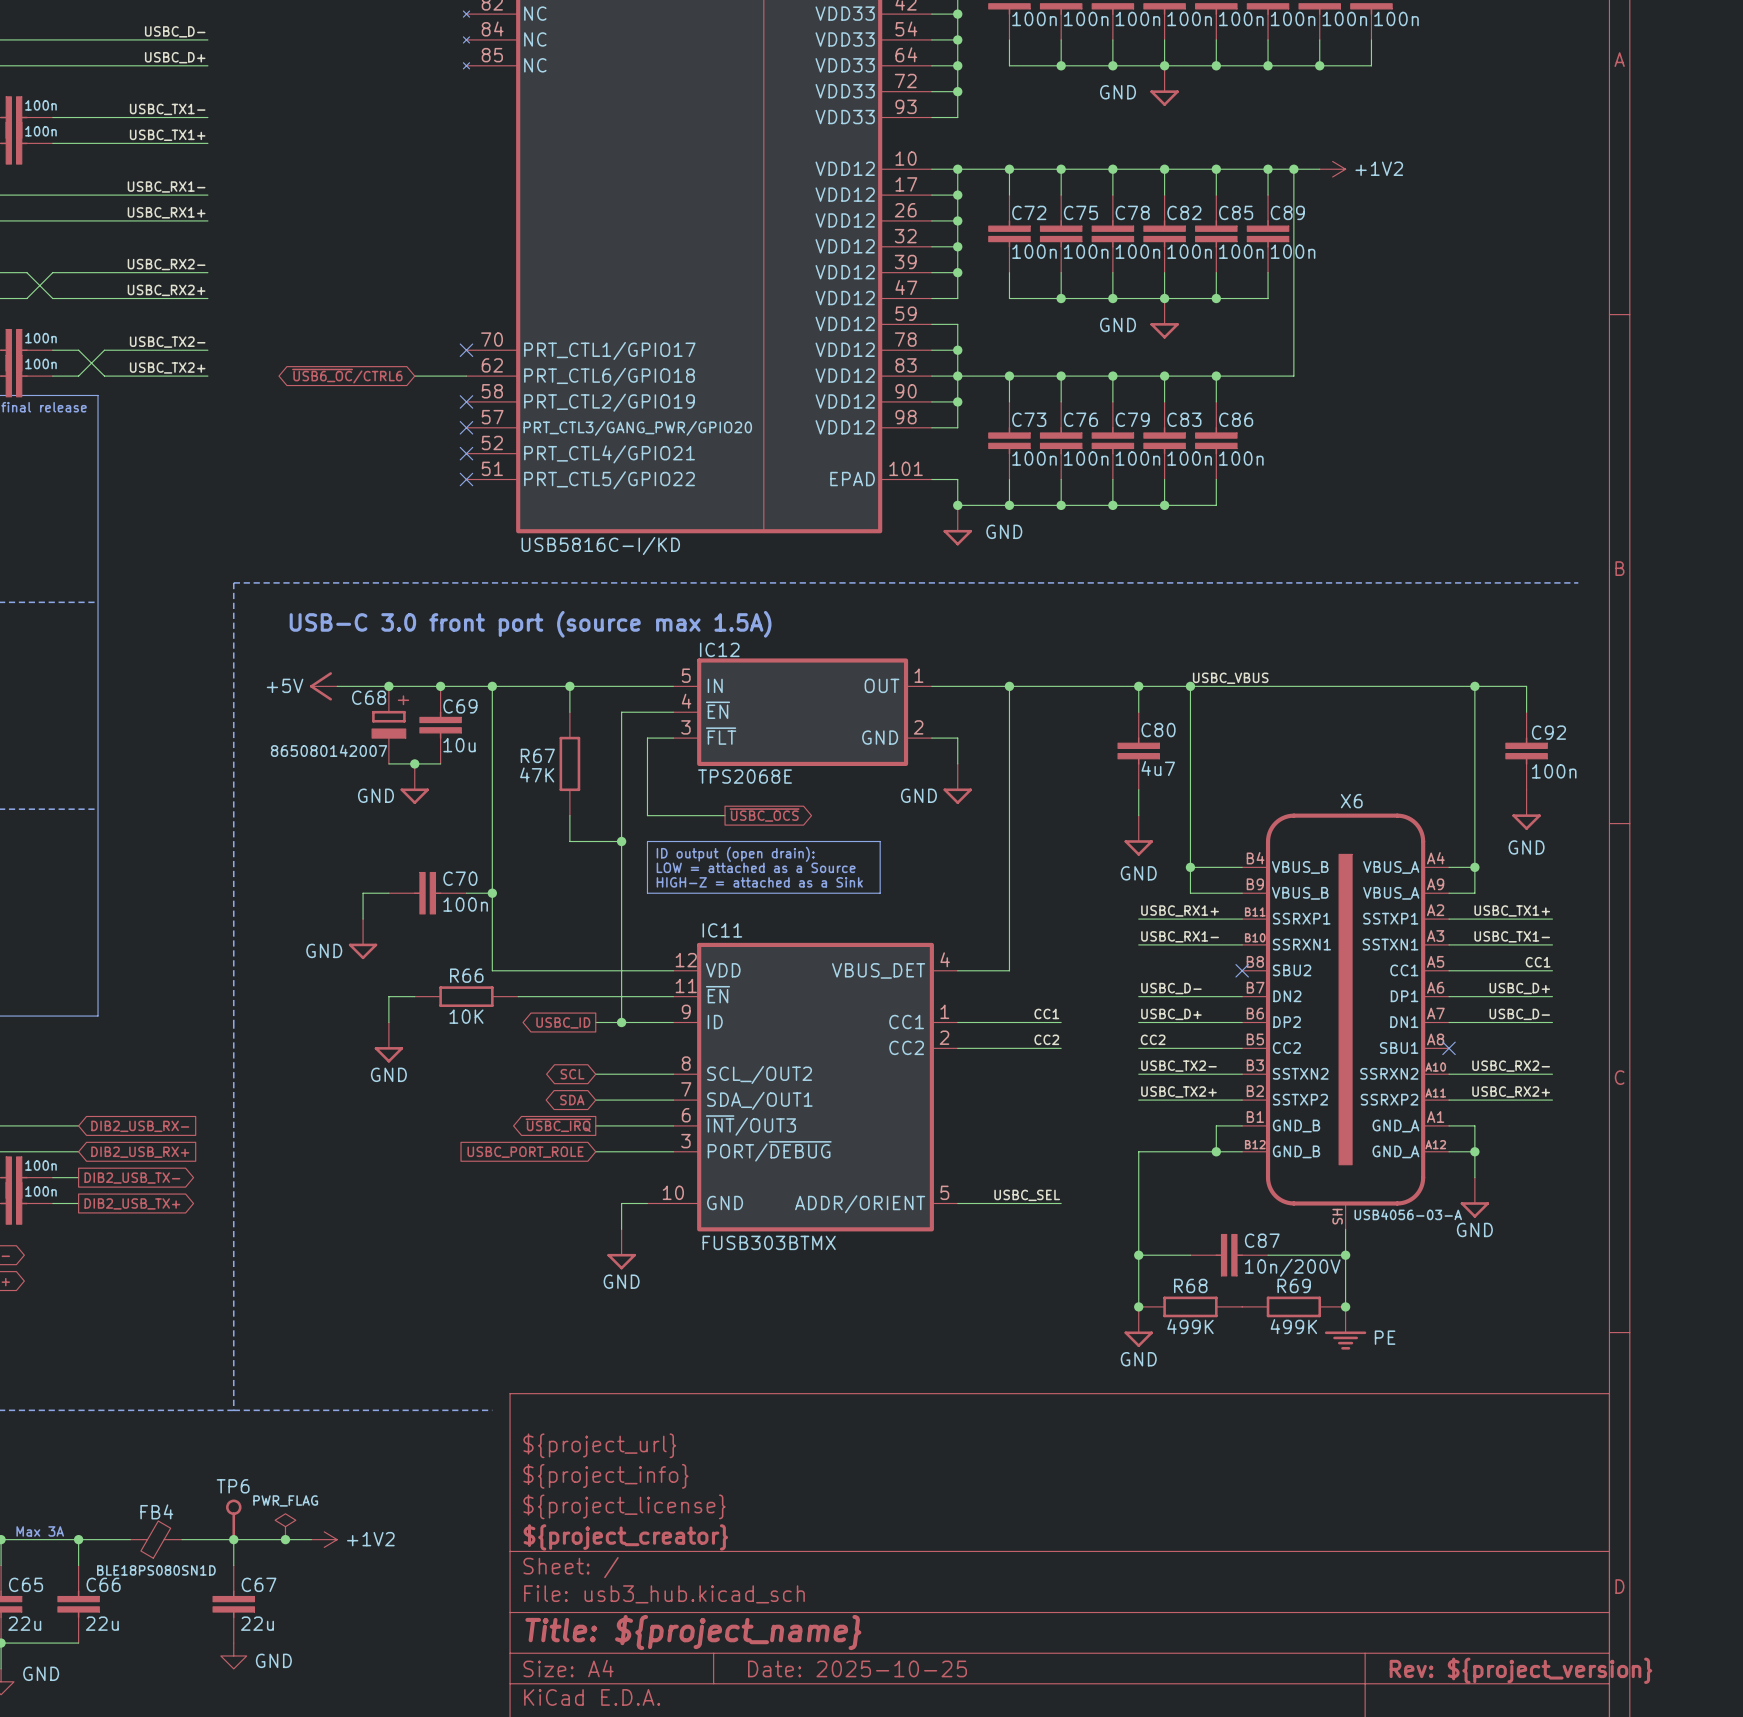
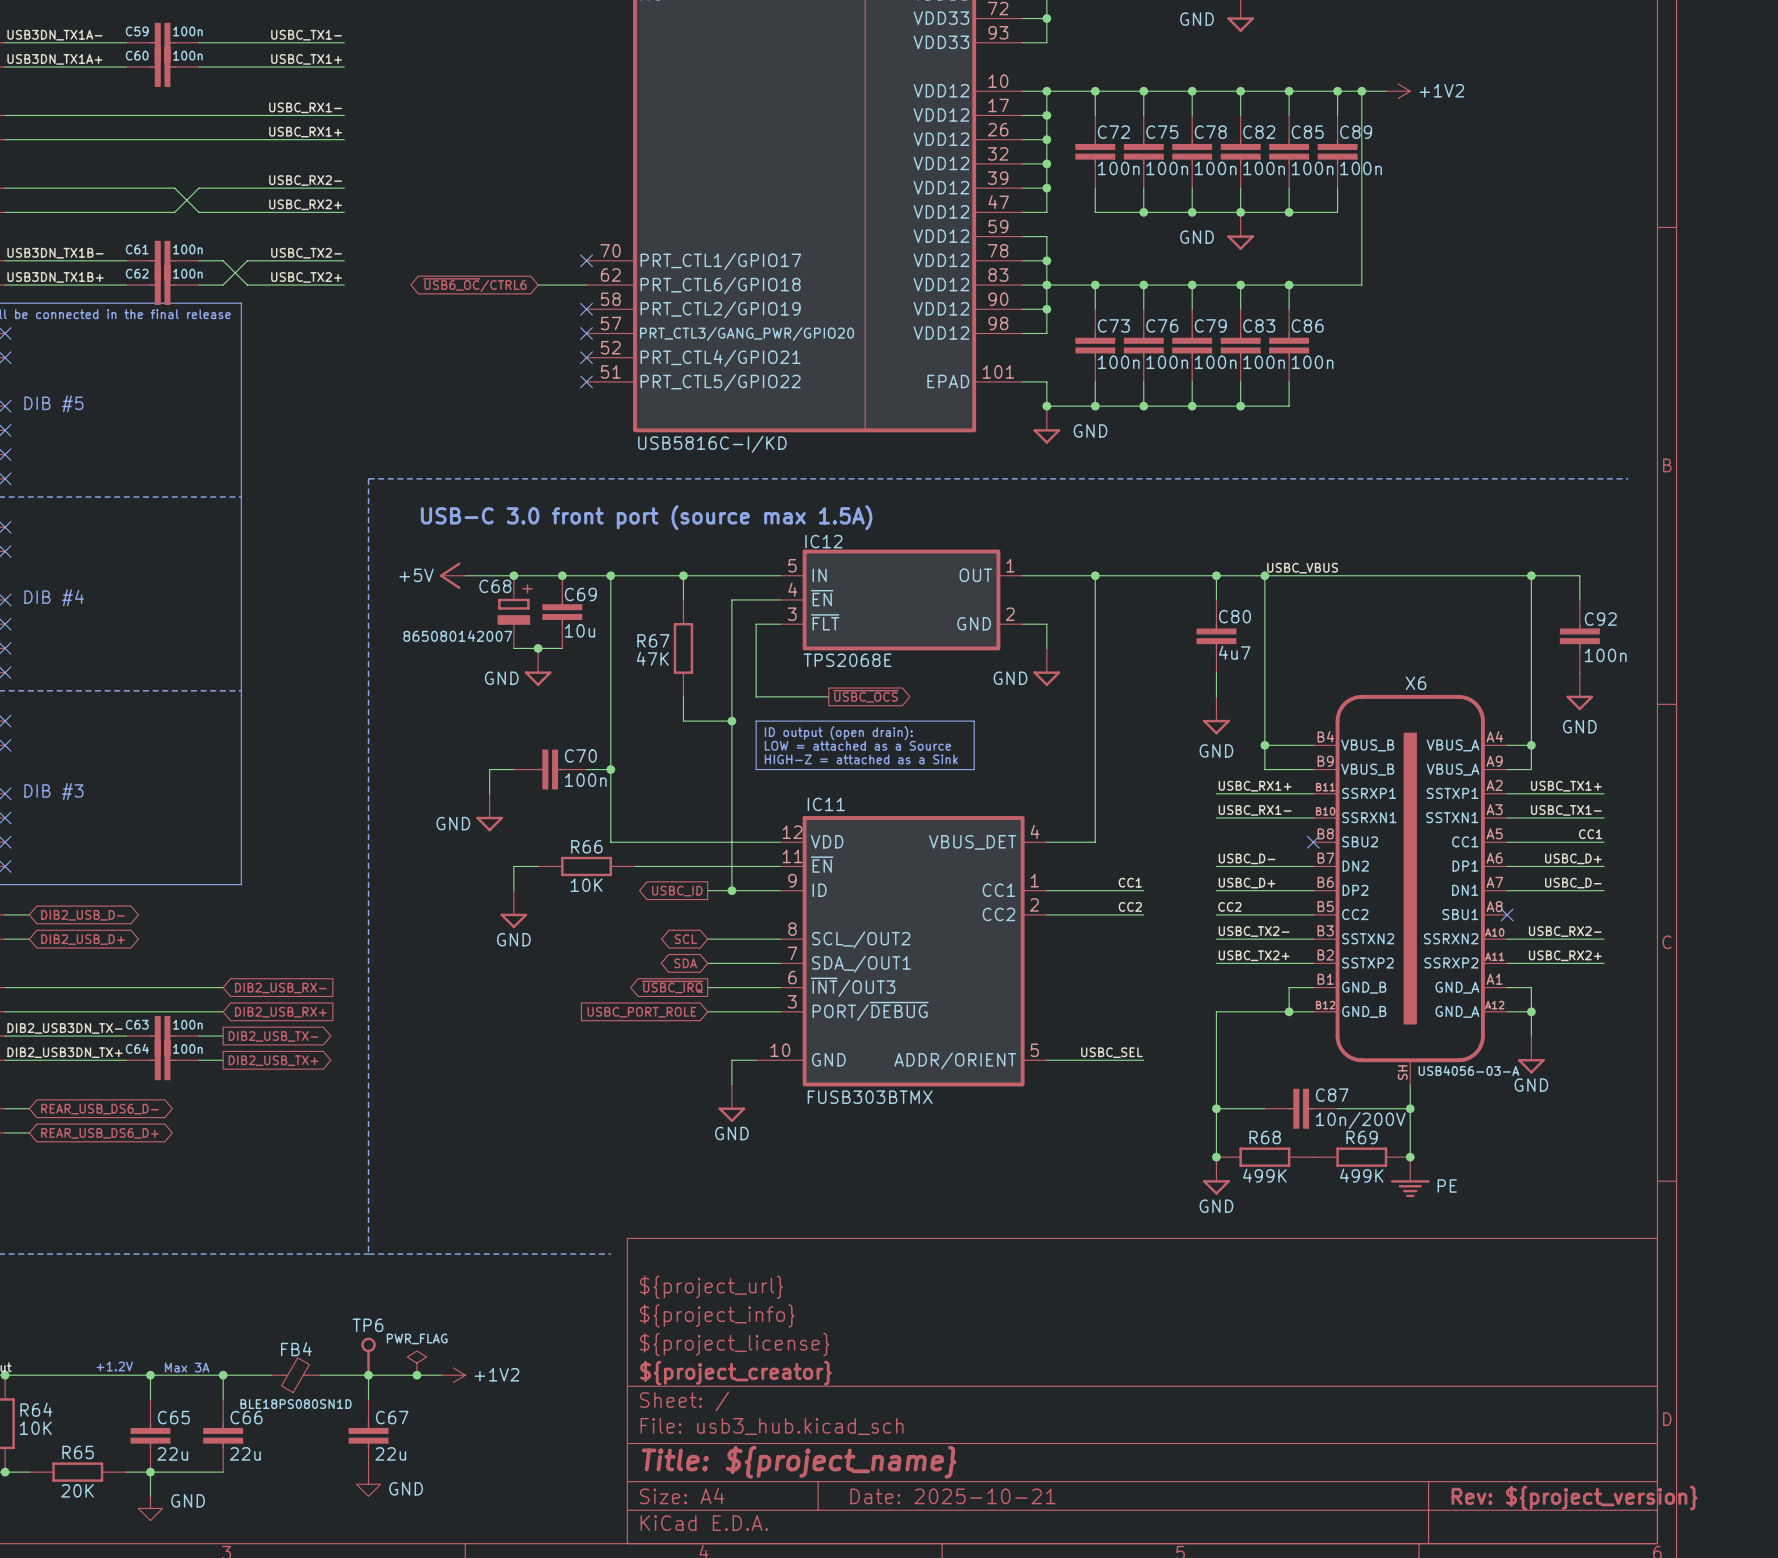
title block: Date: 2025-10-25 (857, 1668) -> Date: 2025-10-21 (952, 1496)

